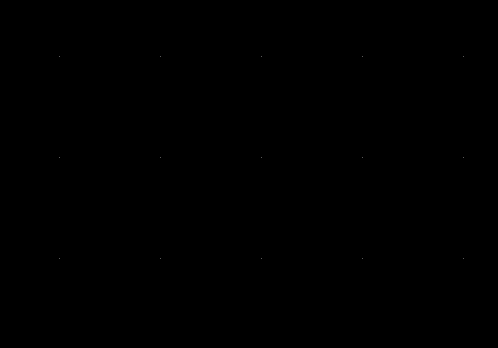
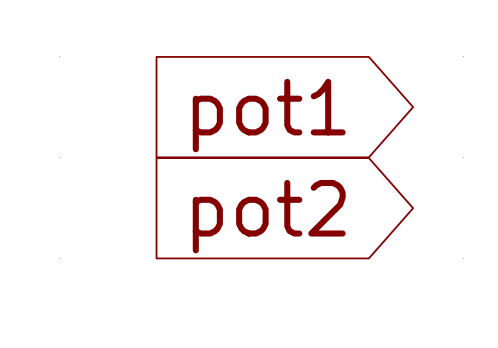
global label: none -> pot1 (269, 115)
global label: none -> pot2 (269, 216)

